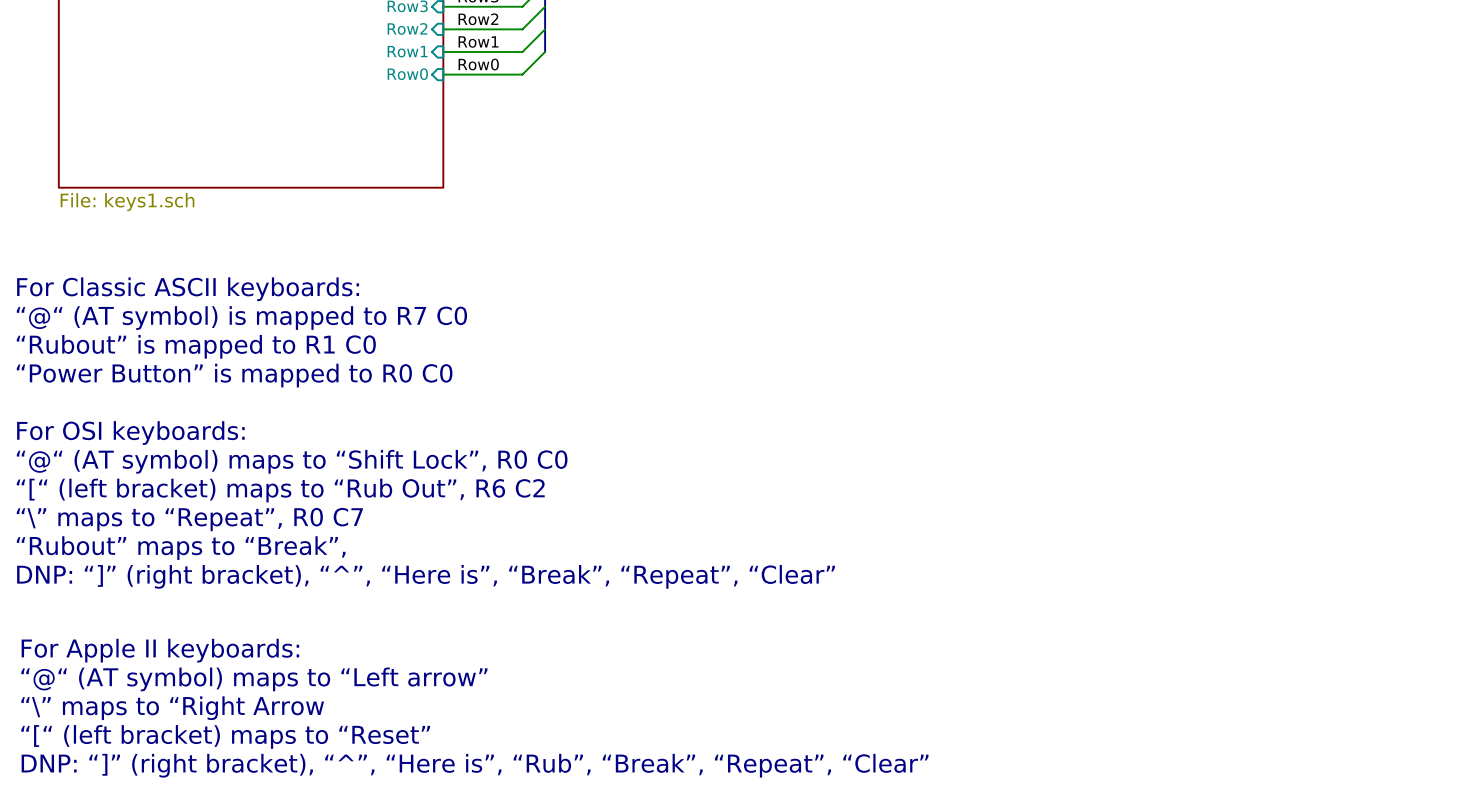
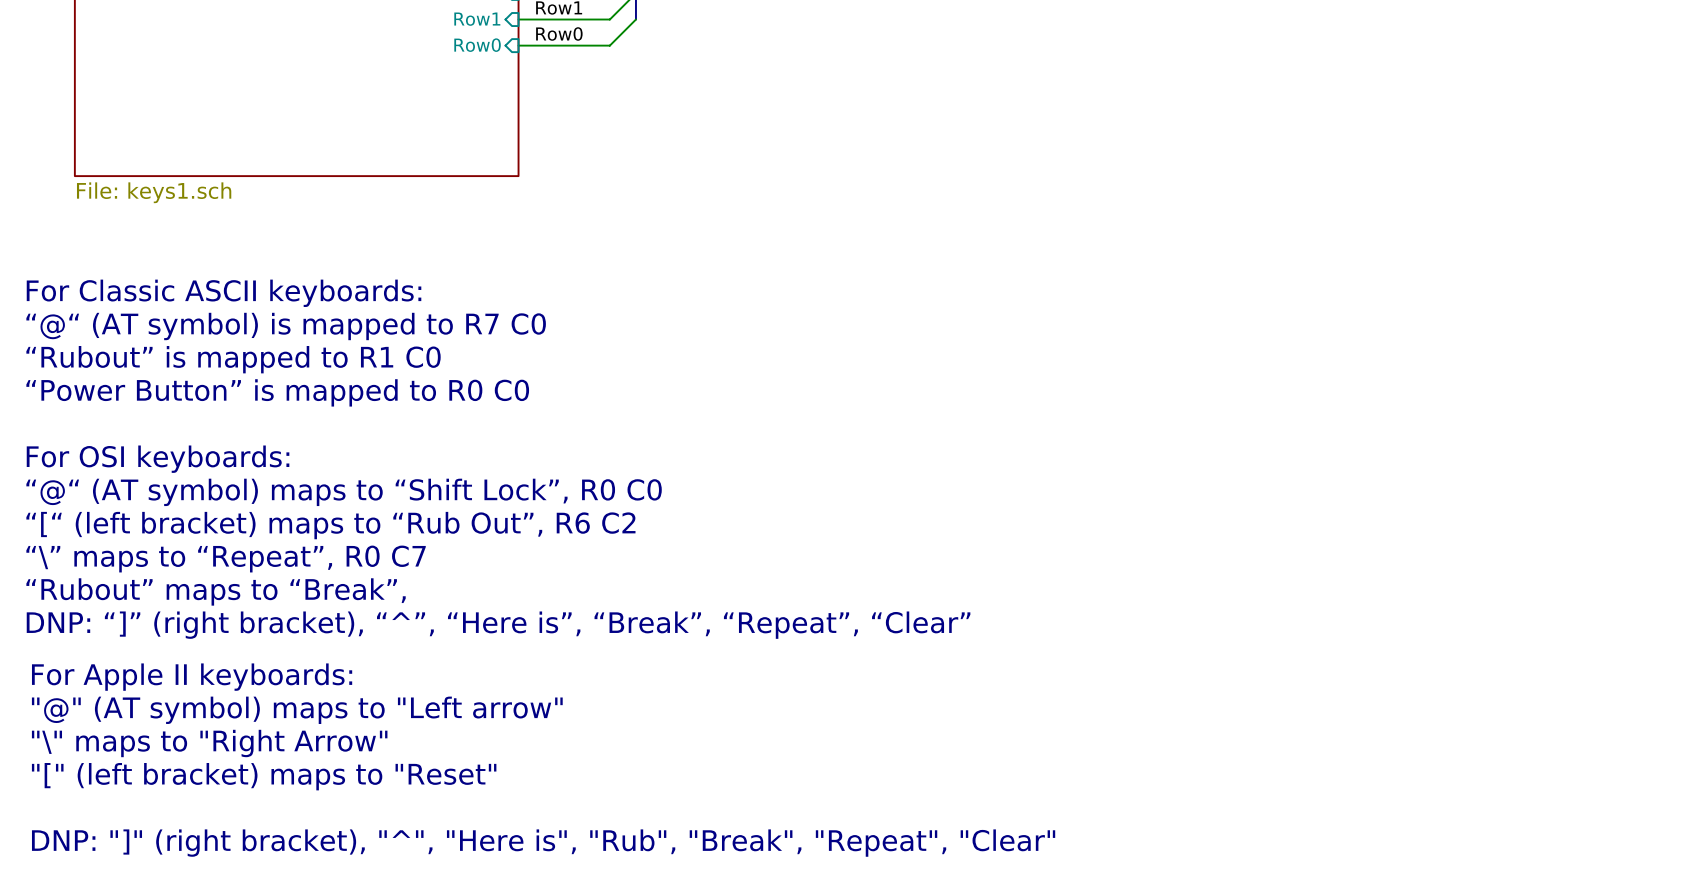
text: none -> For Apple II keyboards: (192, 677)
text: For Apple II keyboards: (160, 650) -> "@" (AT symbol) maps to "Left arrow" (297, 710)
text: “@“ (AT symbol) maps to “Left arrow” (254, 679) -> "\" maps to "Right Arrow" (209, 743)
text: “\” maps to “Right Arrow (172, 708) -> "[" (left bracket) maps to "Reset" (264, 776)
text: “[“ (left bracket) maps to “Reset” (225, 736) -> none
text: DNP: “]” (right bracket), “^”, “Here is”, “Rub”, “Break”, “Repeat”, “Clear” (475, 765) -> DNP: "]" (right bracket), "^", "Here is", "Rub", "Break", "Repeat", "Clear" (543, 843)

